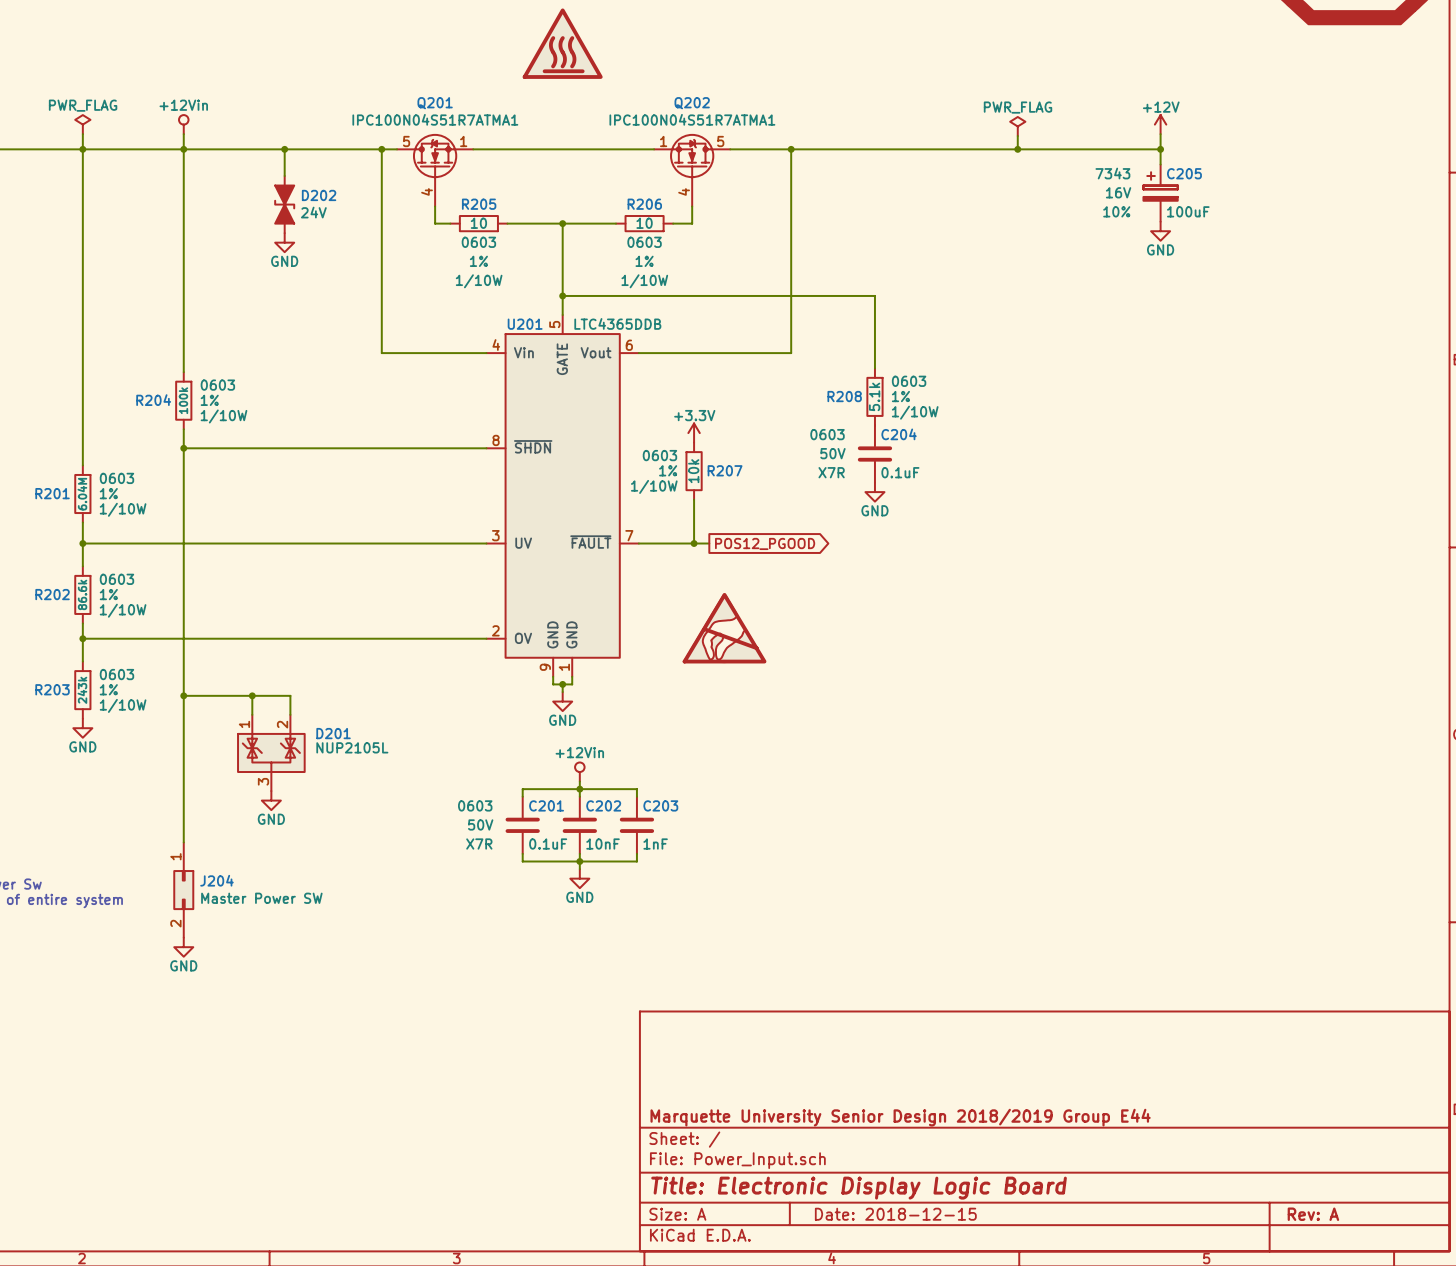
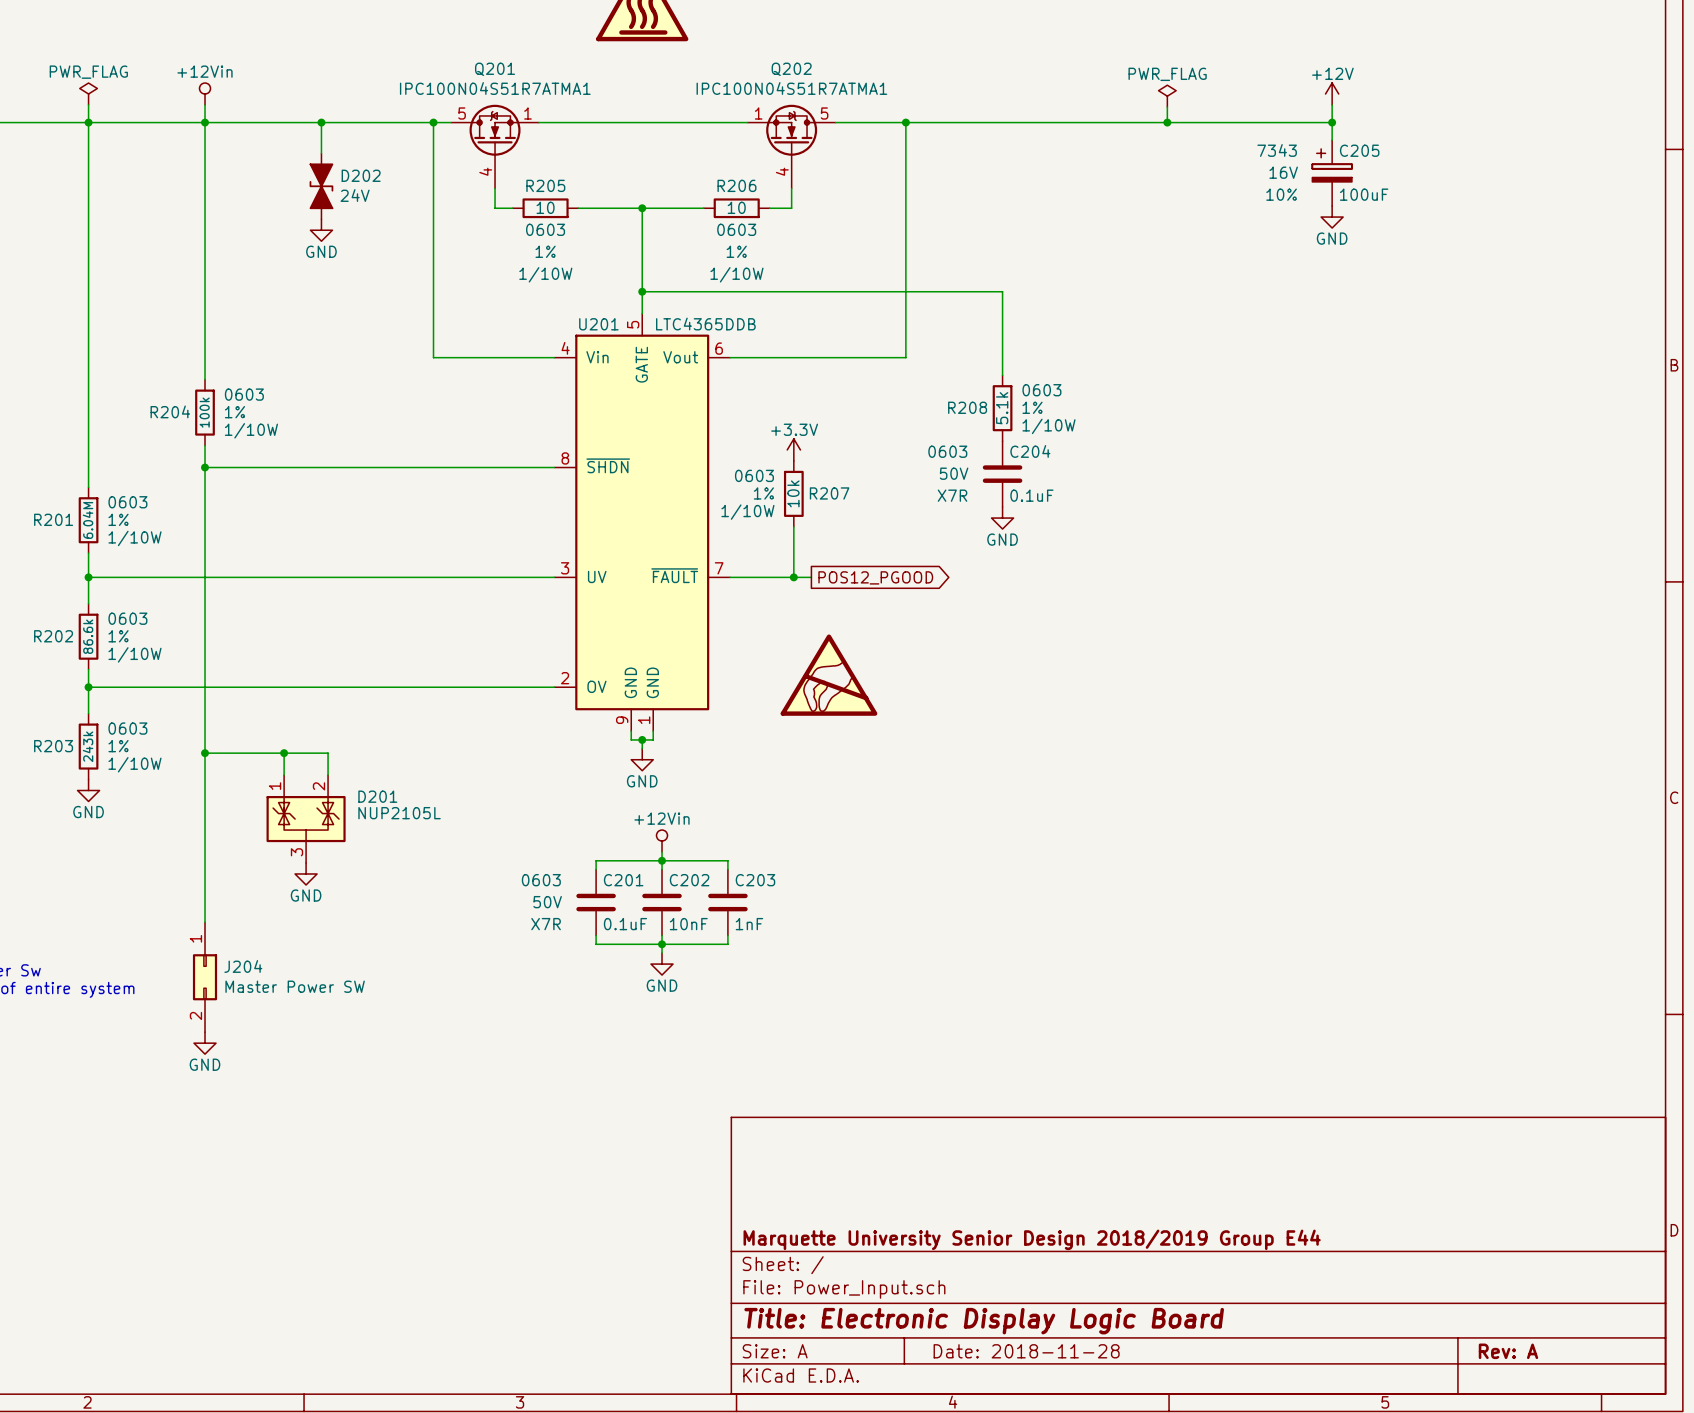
title block: Date: 2018-12-15 (895, 1214) -> Date: 2018-11-28 (1026, 1351)

